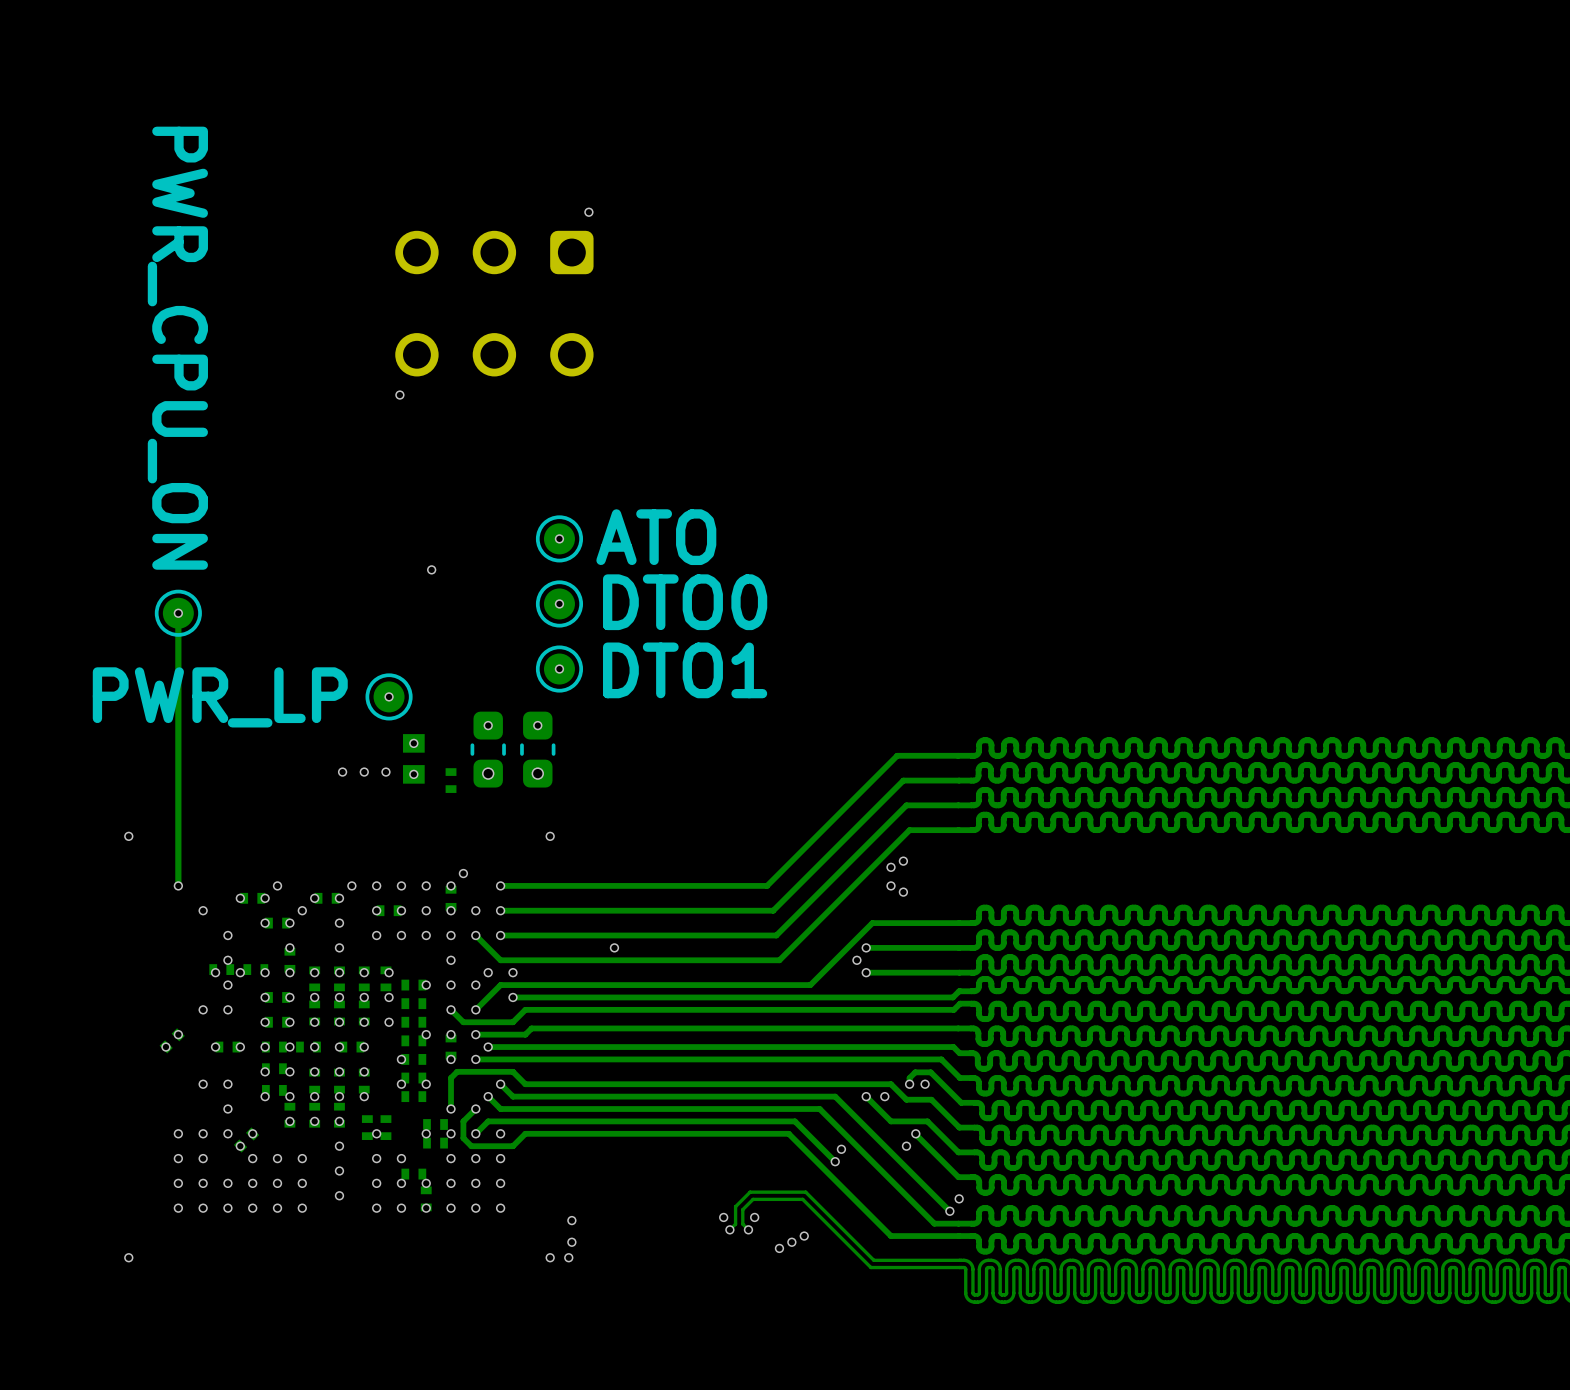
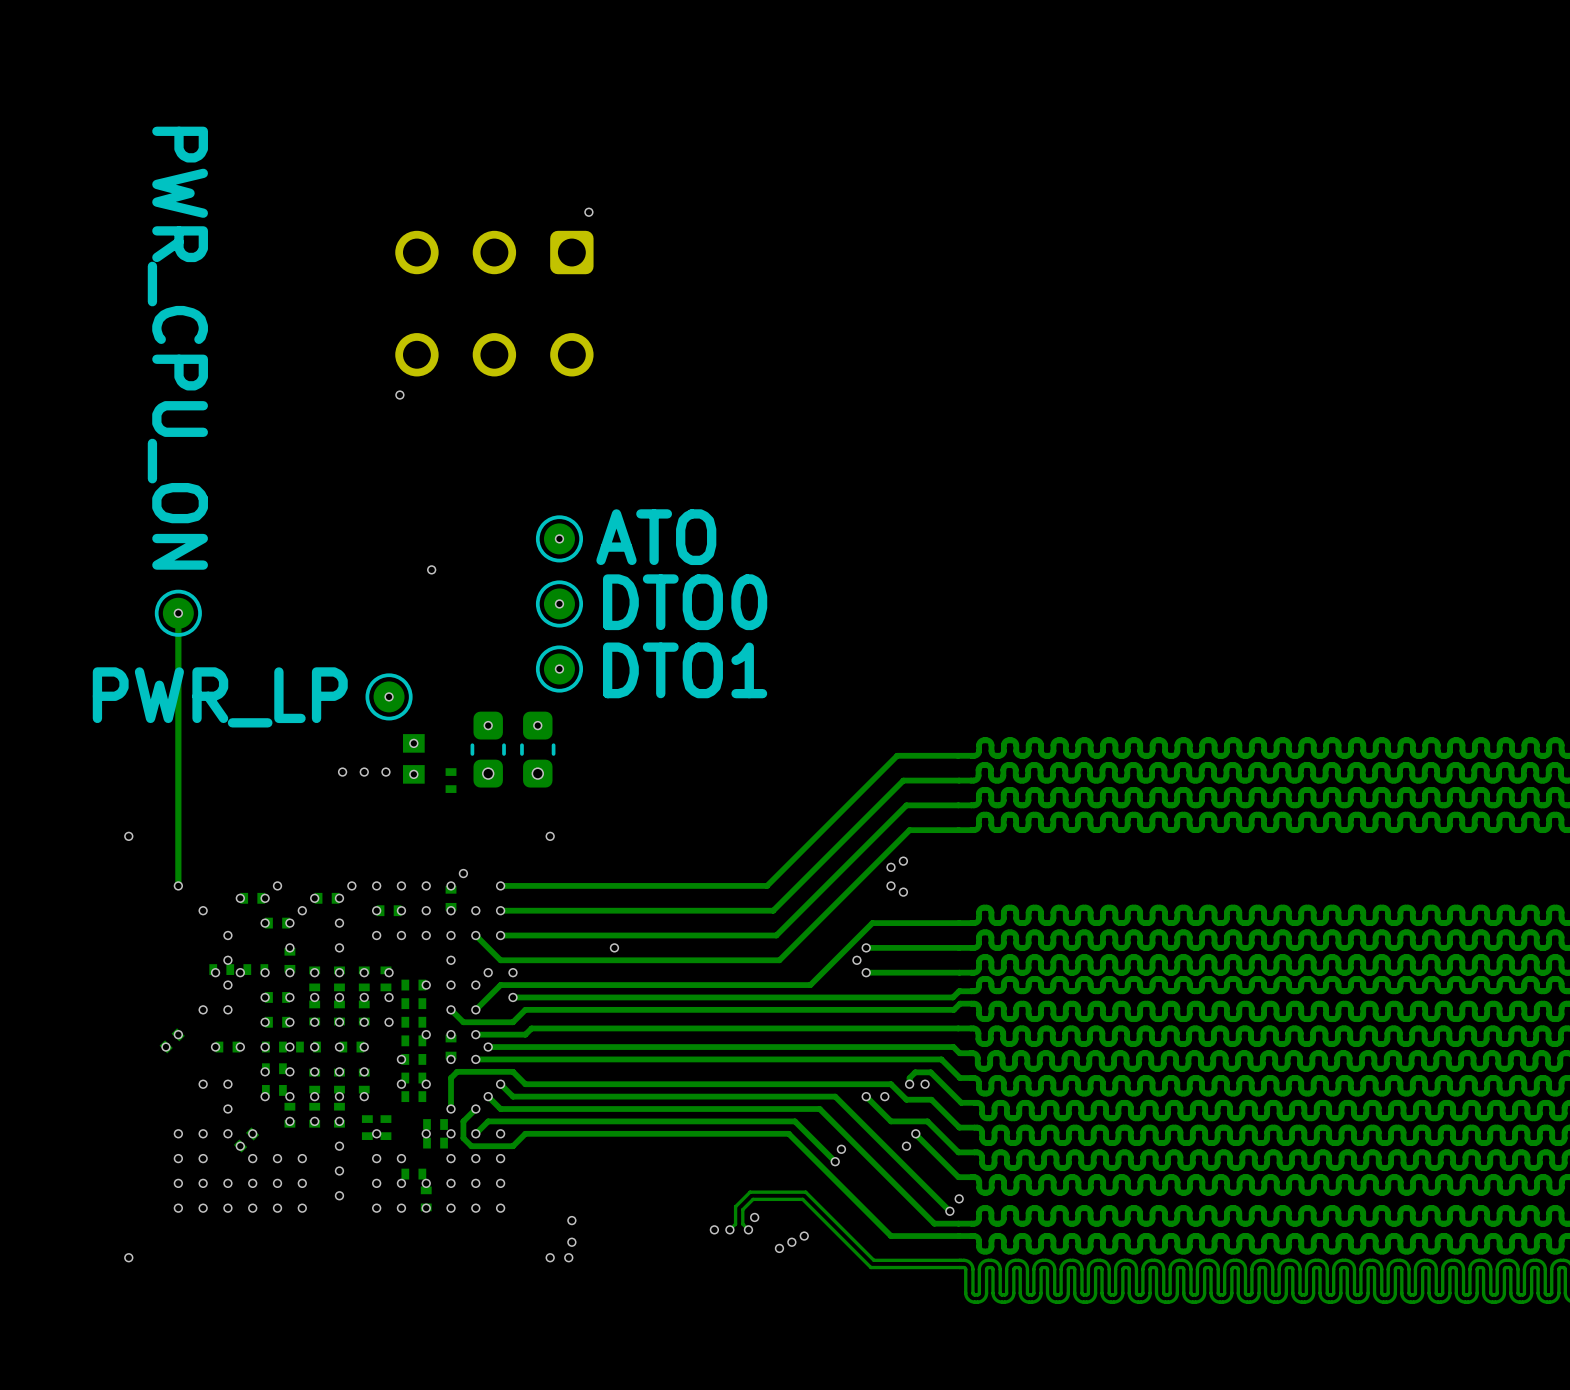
via position: (723, 1217) -> (714, 1229)

